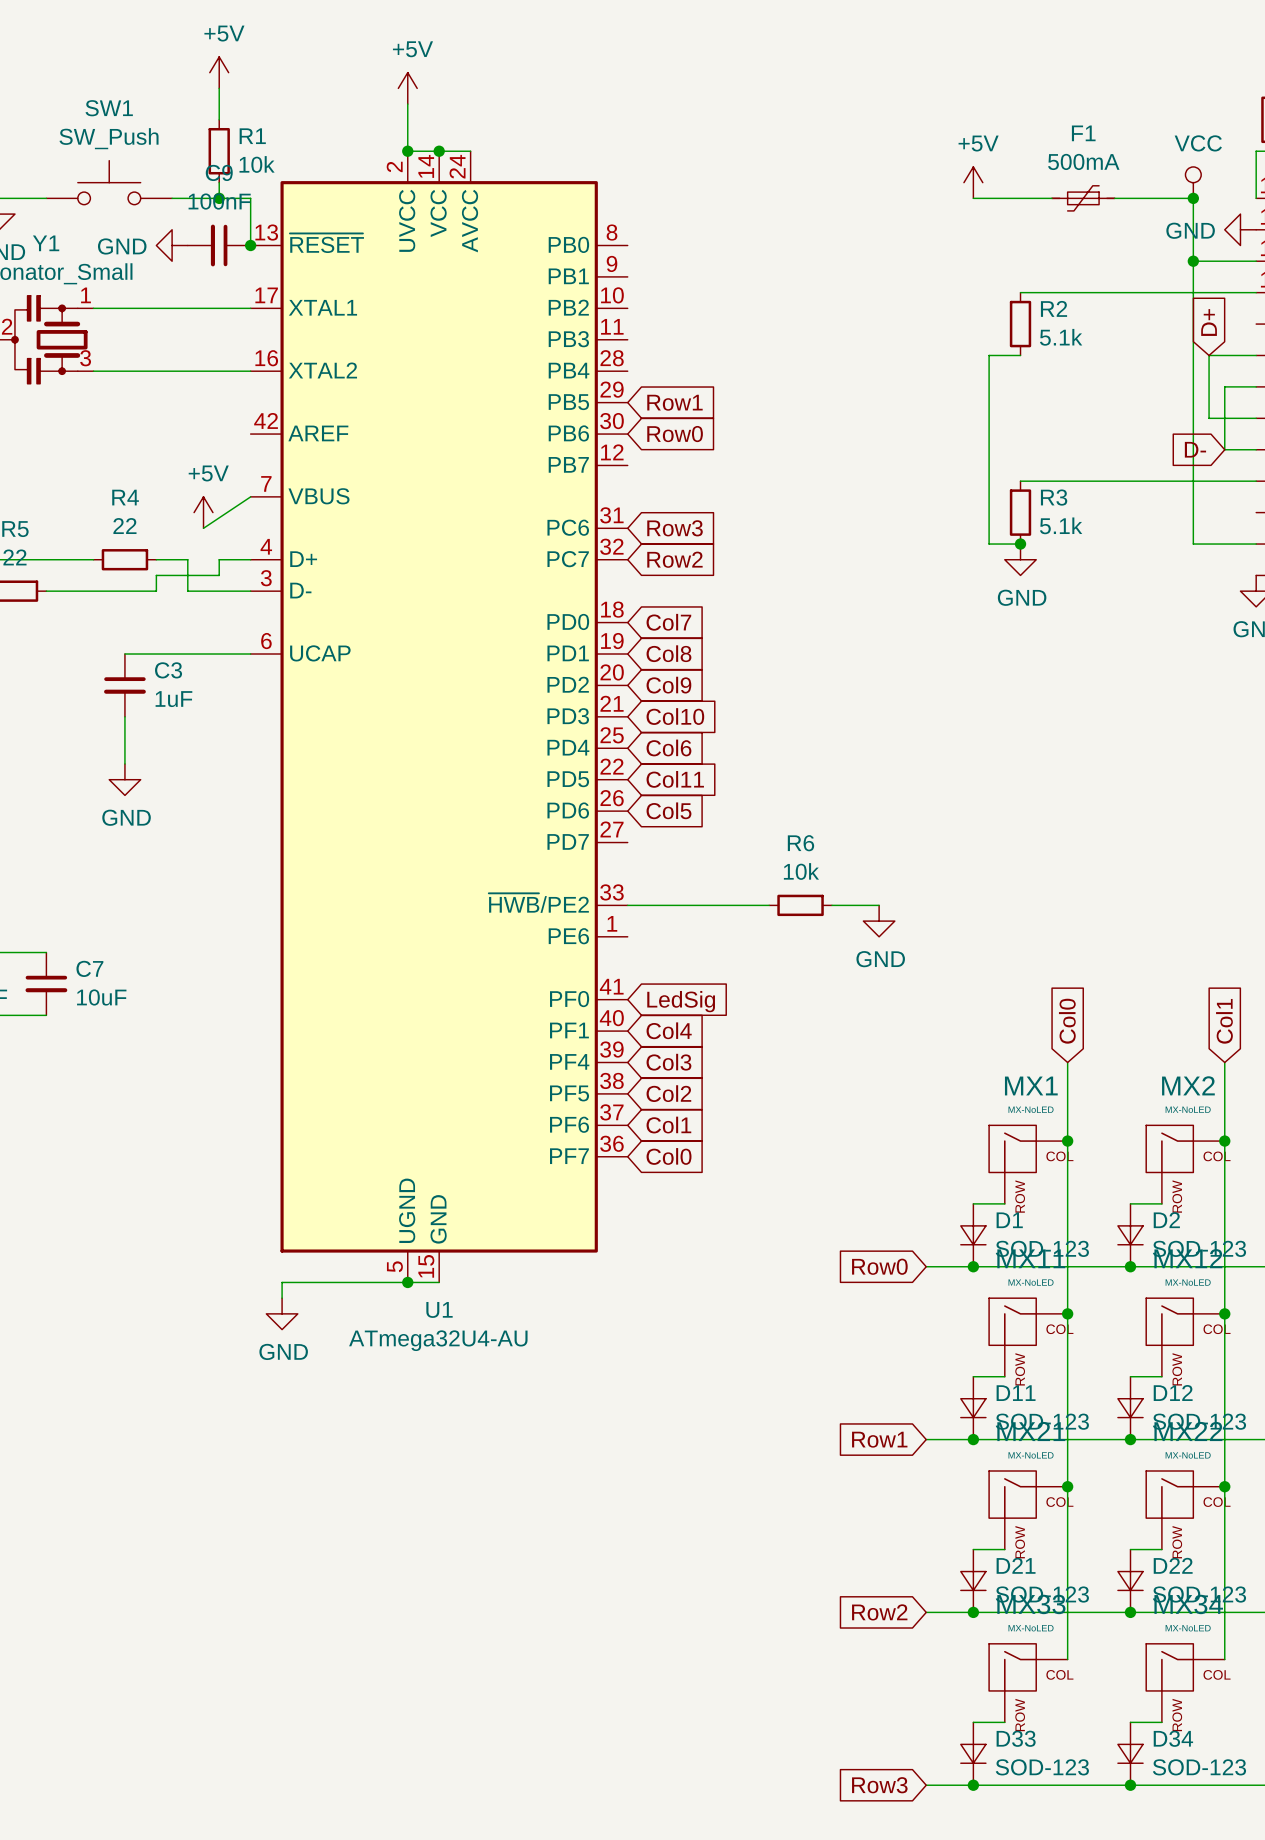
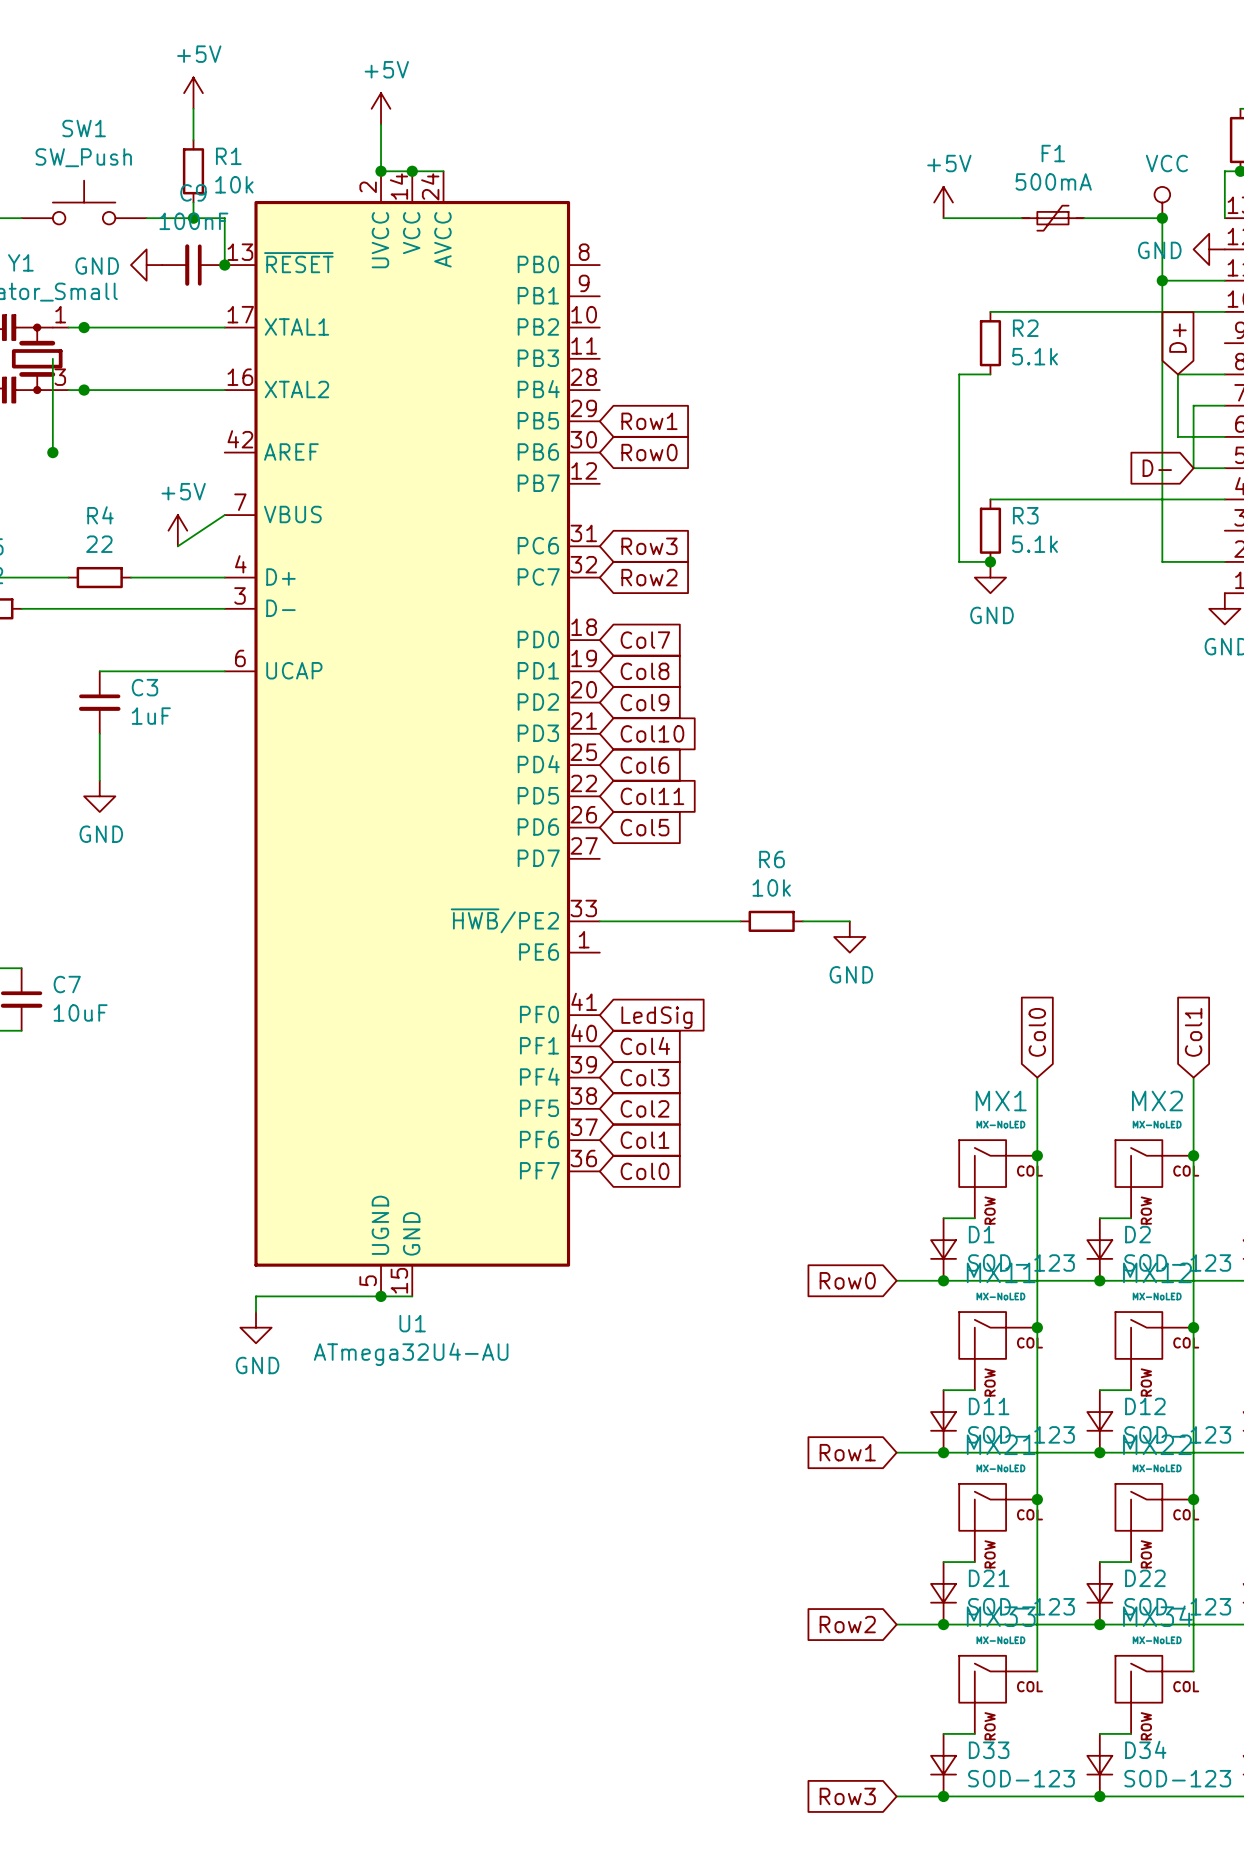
junction: none -> (84, 327)
wire: none -> (52, 358) (52, 452)
junction: none -> (84, 390)
junction: none -> (52, 452)
wire: (187, 559) (187, 591) -> (162, 577) (193, 577)
wire: (219, 559) (219, 575) (156, 575) (156, 591) -> (162, 608) (130, 608)

